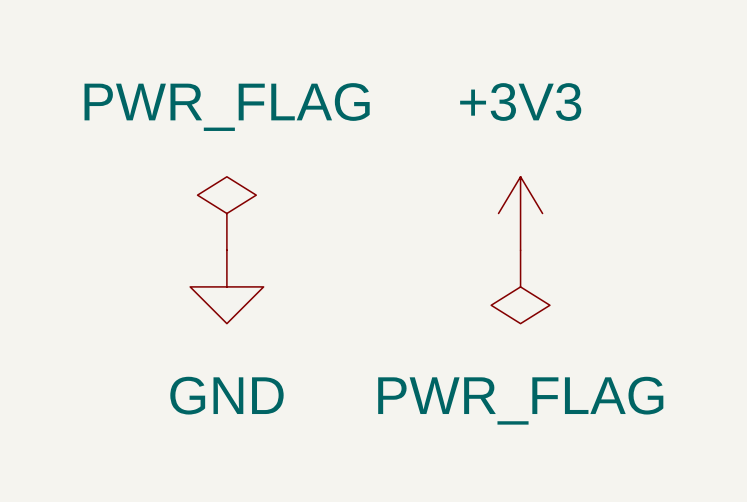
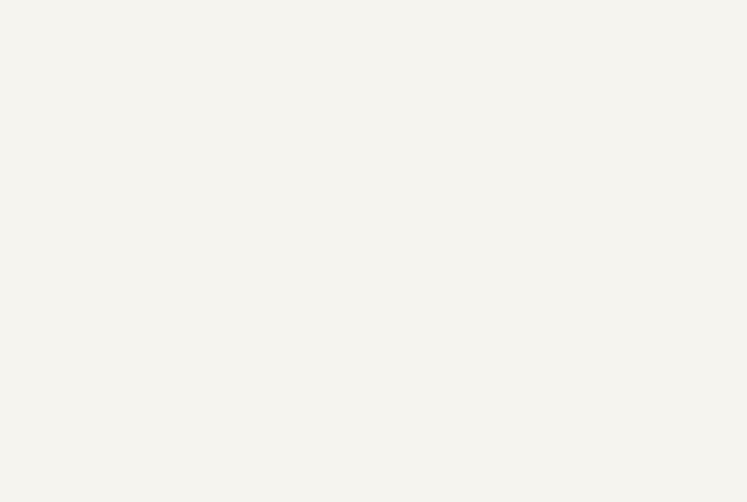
power symbol: PWR_FLAG (226, 213) -> none
power symbol: +3V3 (520, 213) -> none
power symbol: GND (226, 286) -> none
power symbol: PWR_FLAG (520, 286) -> none

